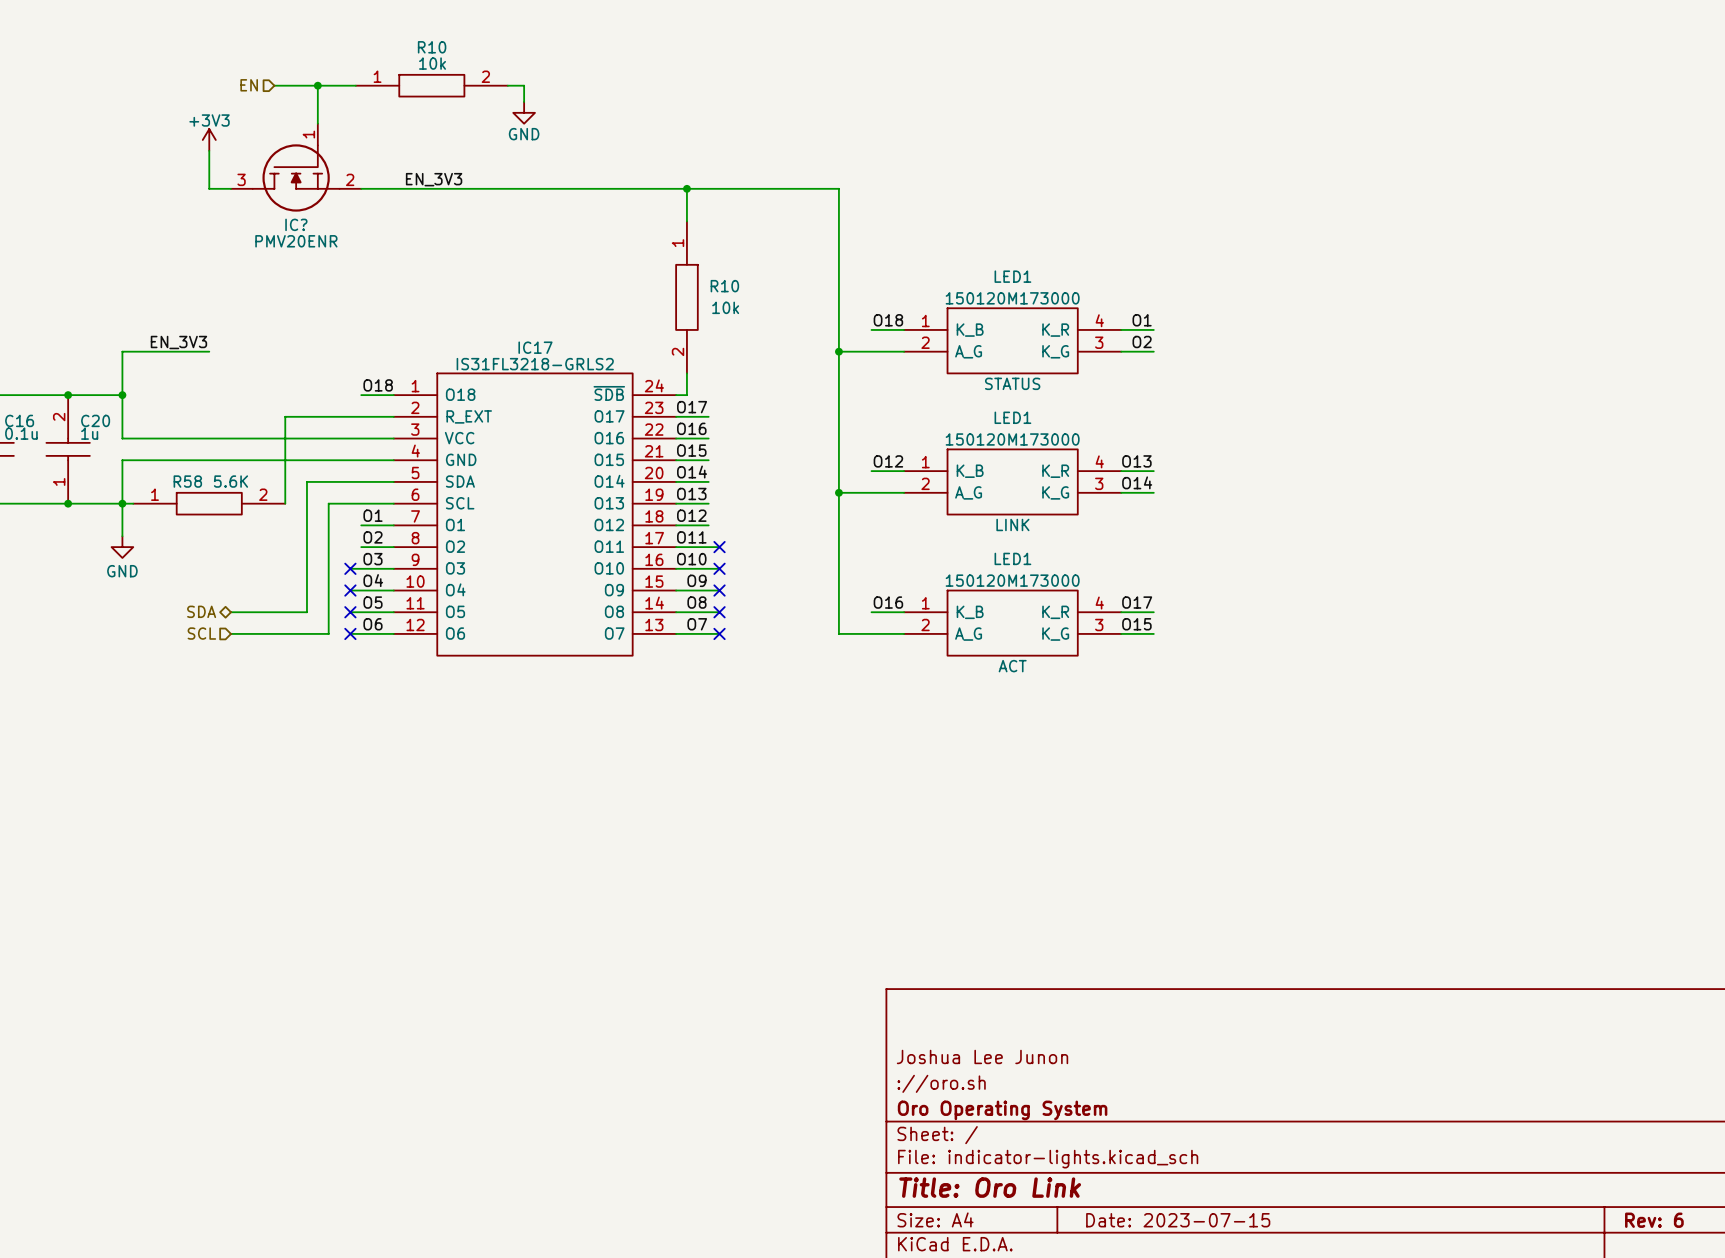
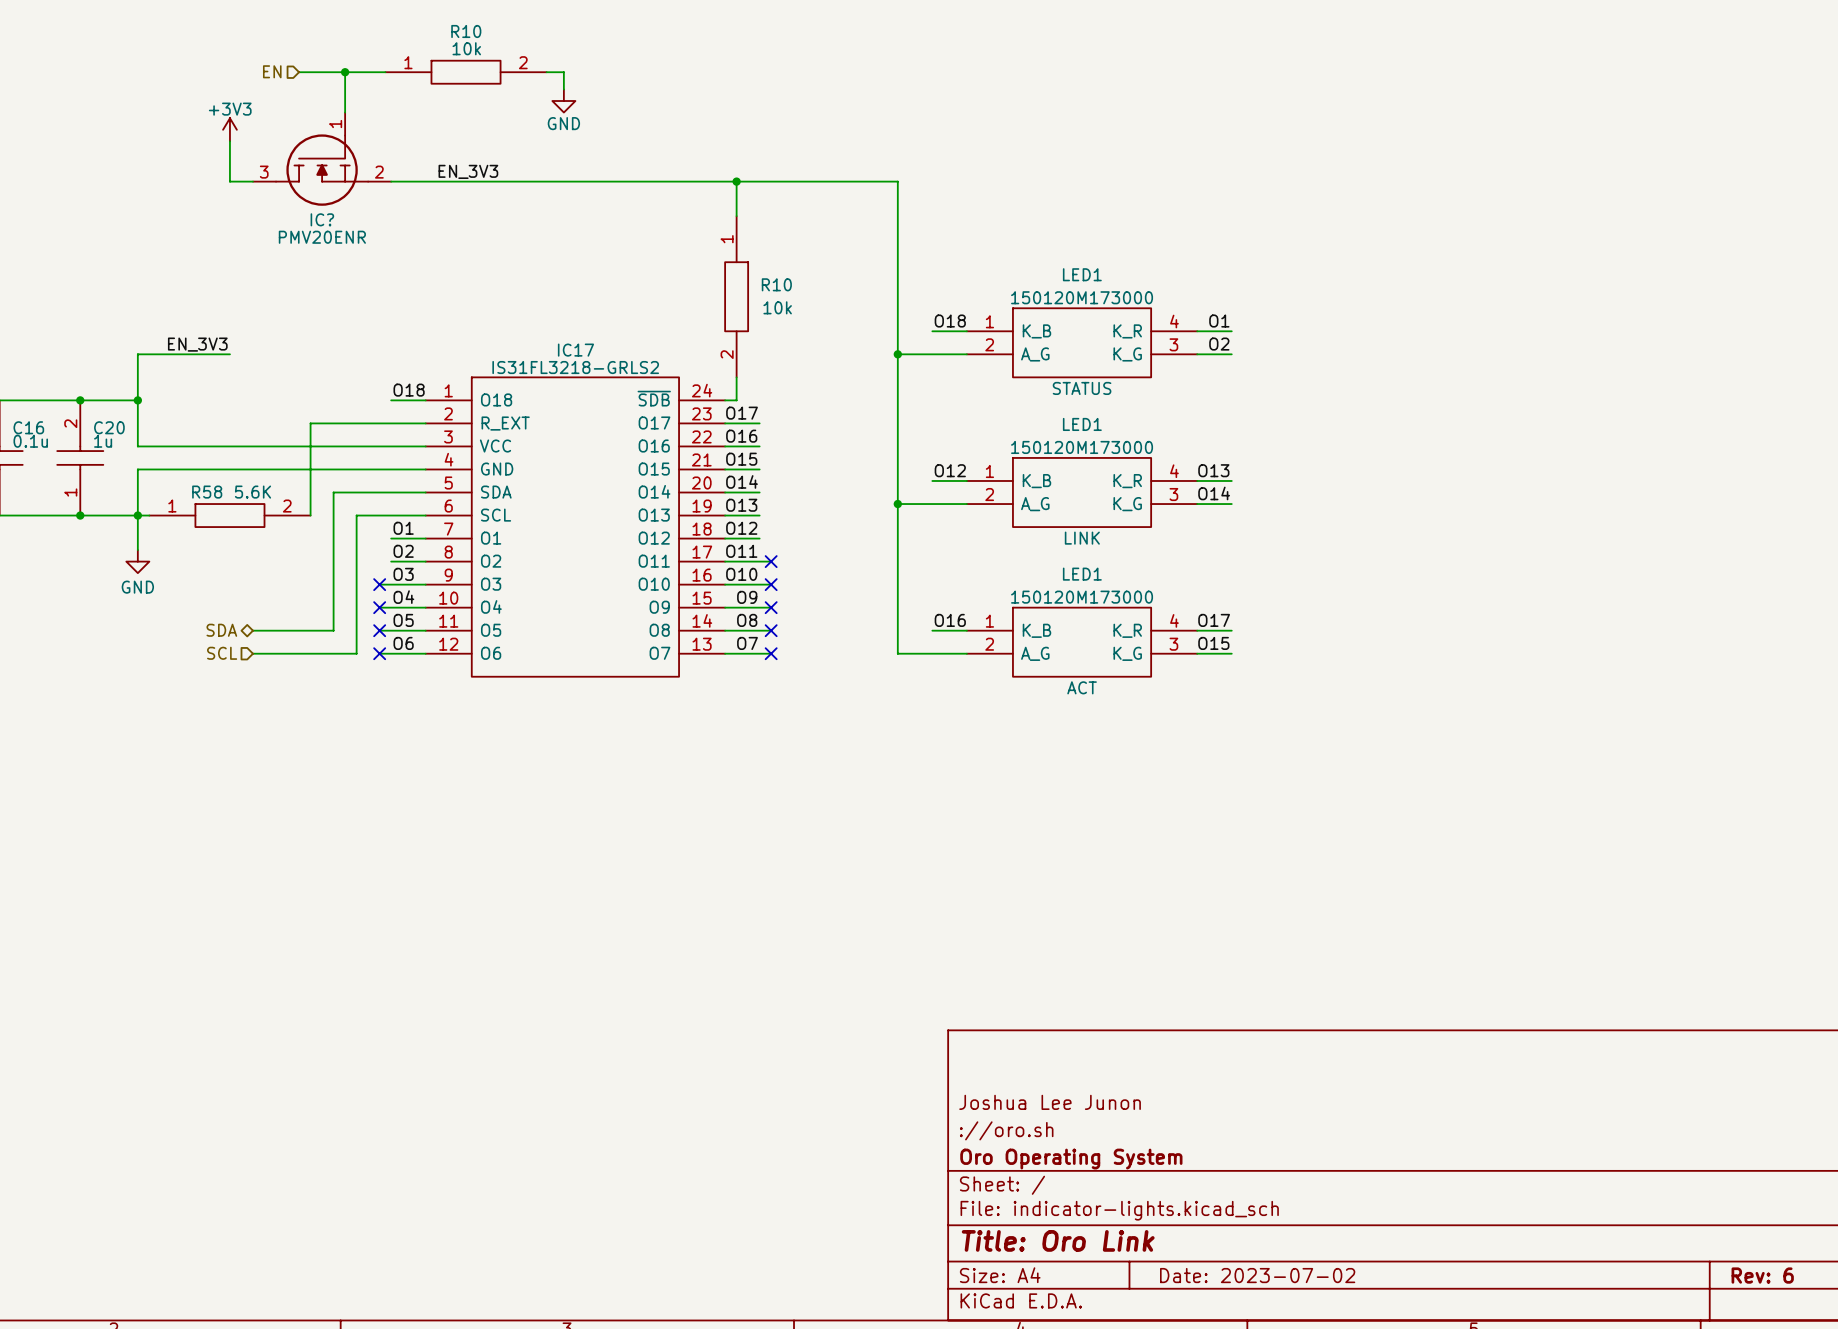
title block: Date: 2023-07-15 (1178, 1220) -> Date: 2023-07-02 (1257, 1275)

